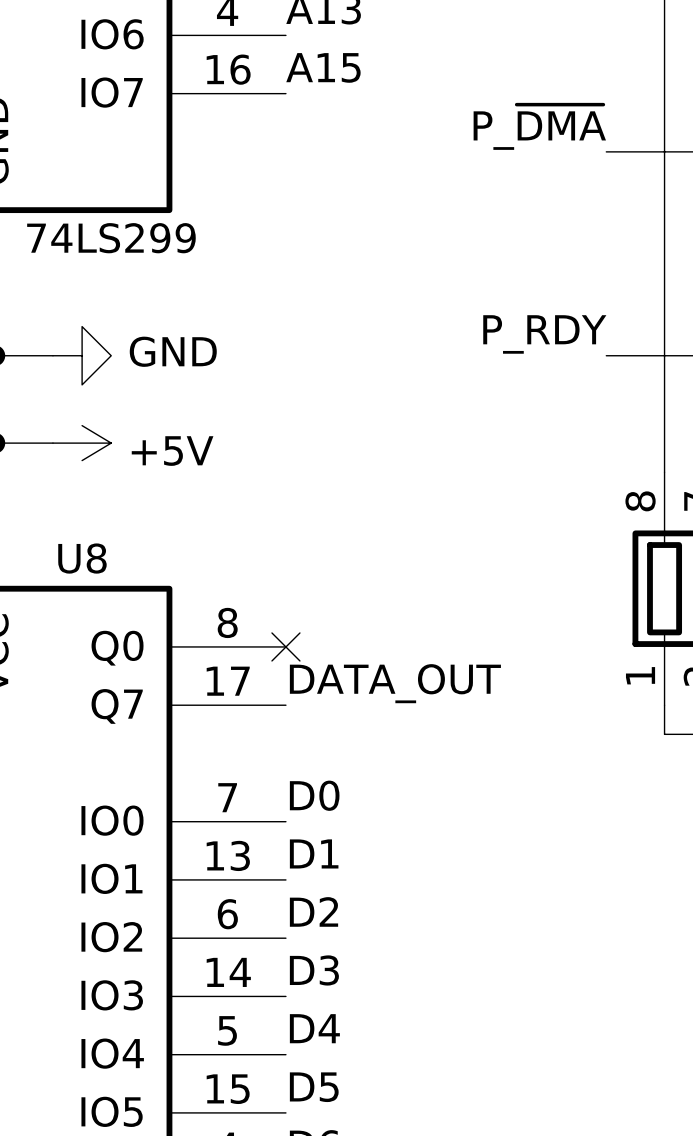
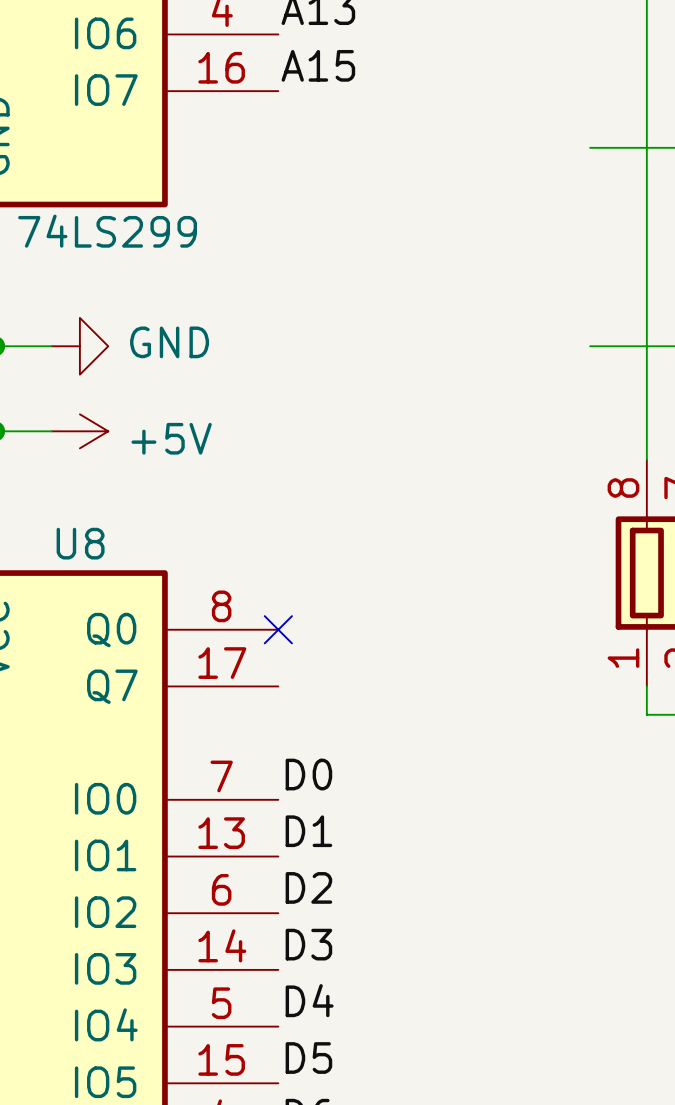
label: P_~{DMA} (539, 127) -> none
label: P_RDY (544, 334) -> none
label: DATA_OUT (395, 683) -> none

